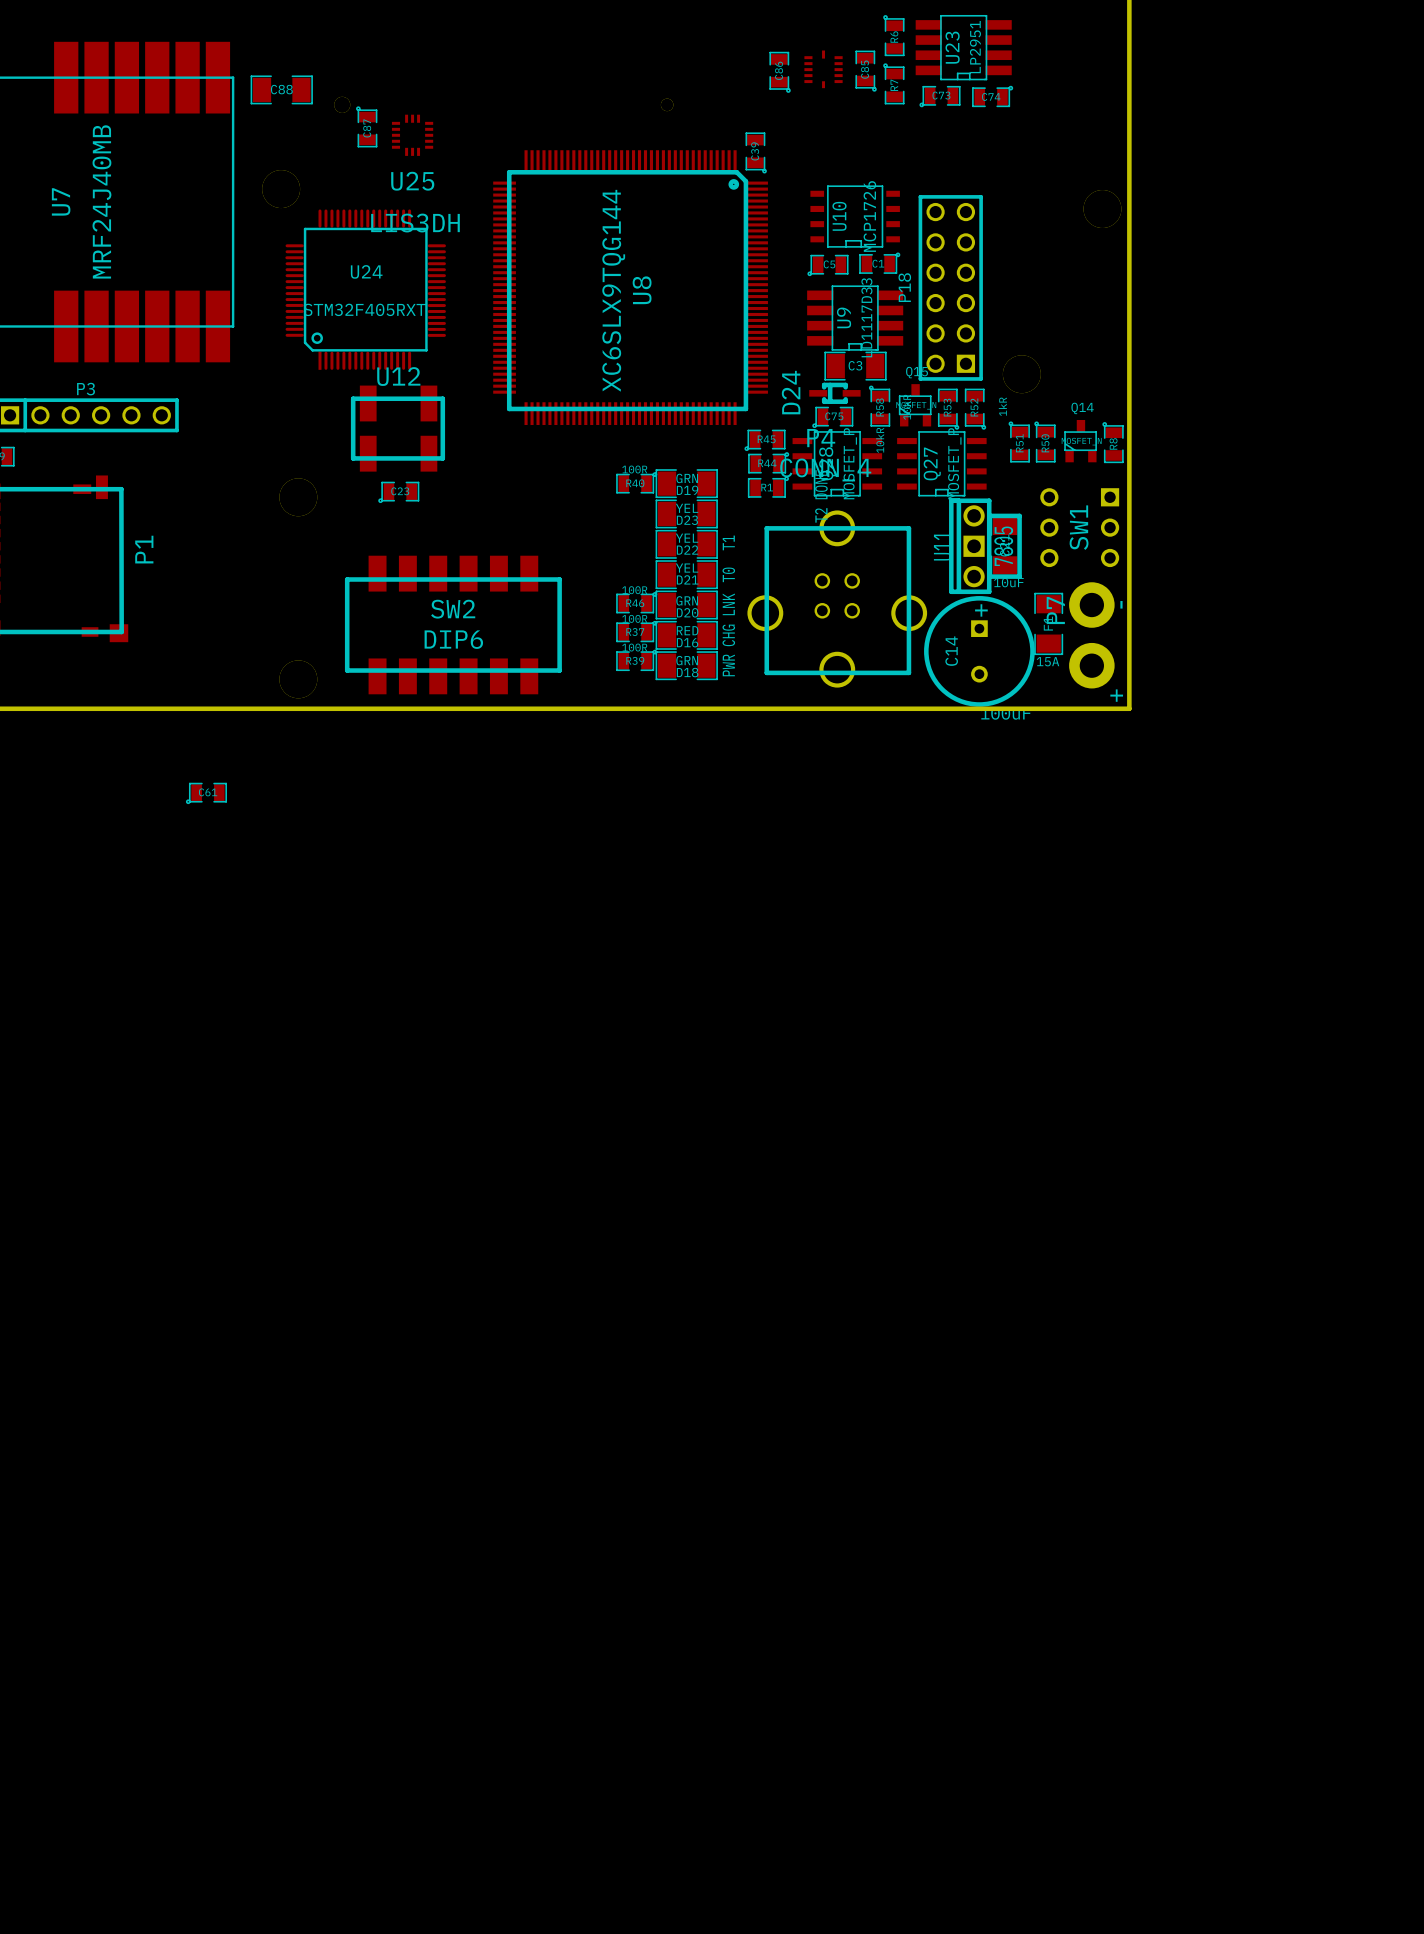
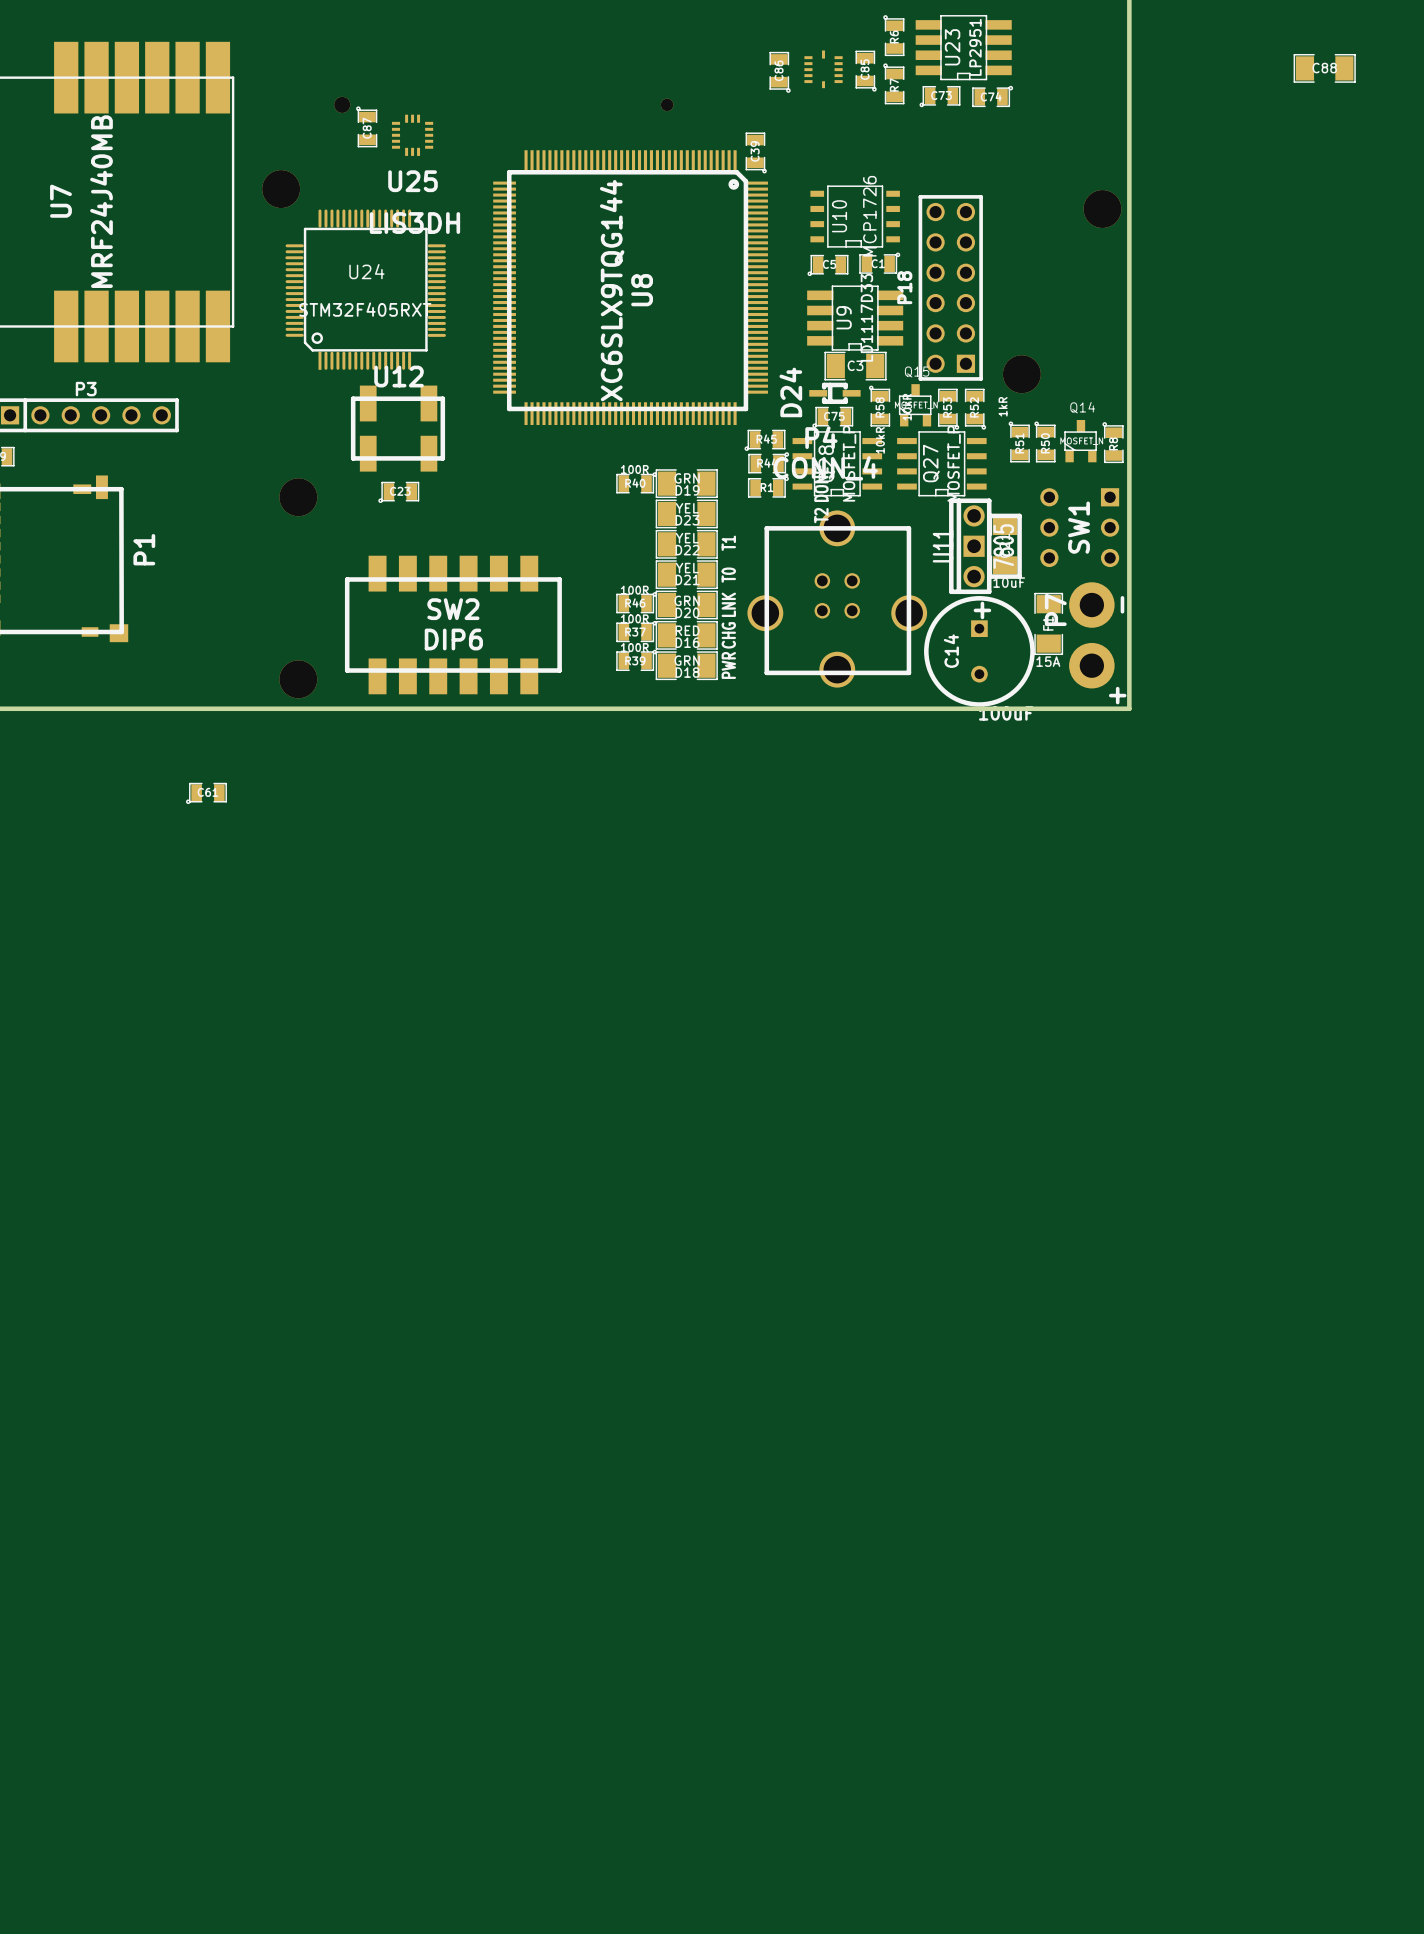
C88 position: (281, 89) -> (1324, 68)

